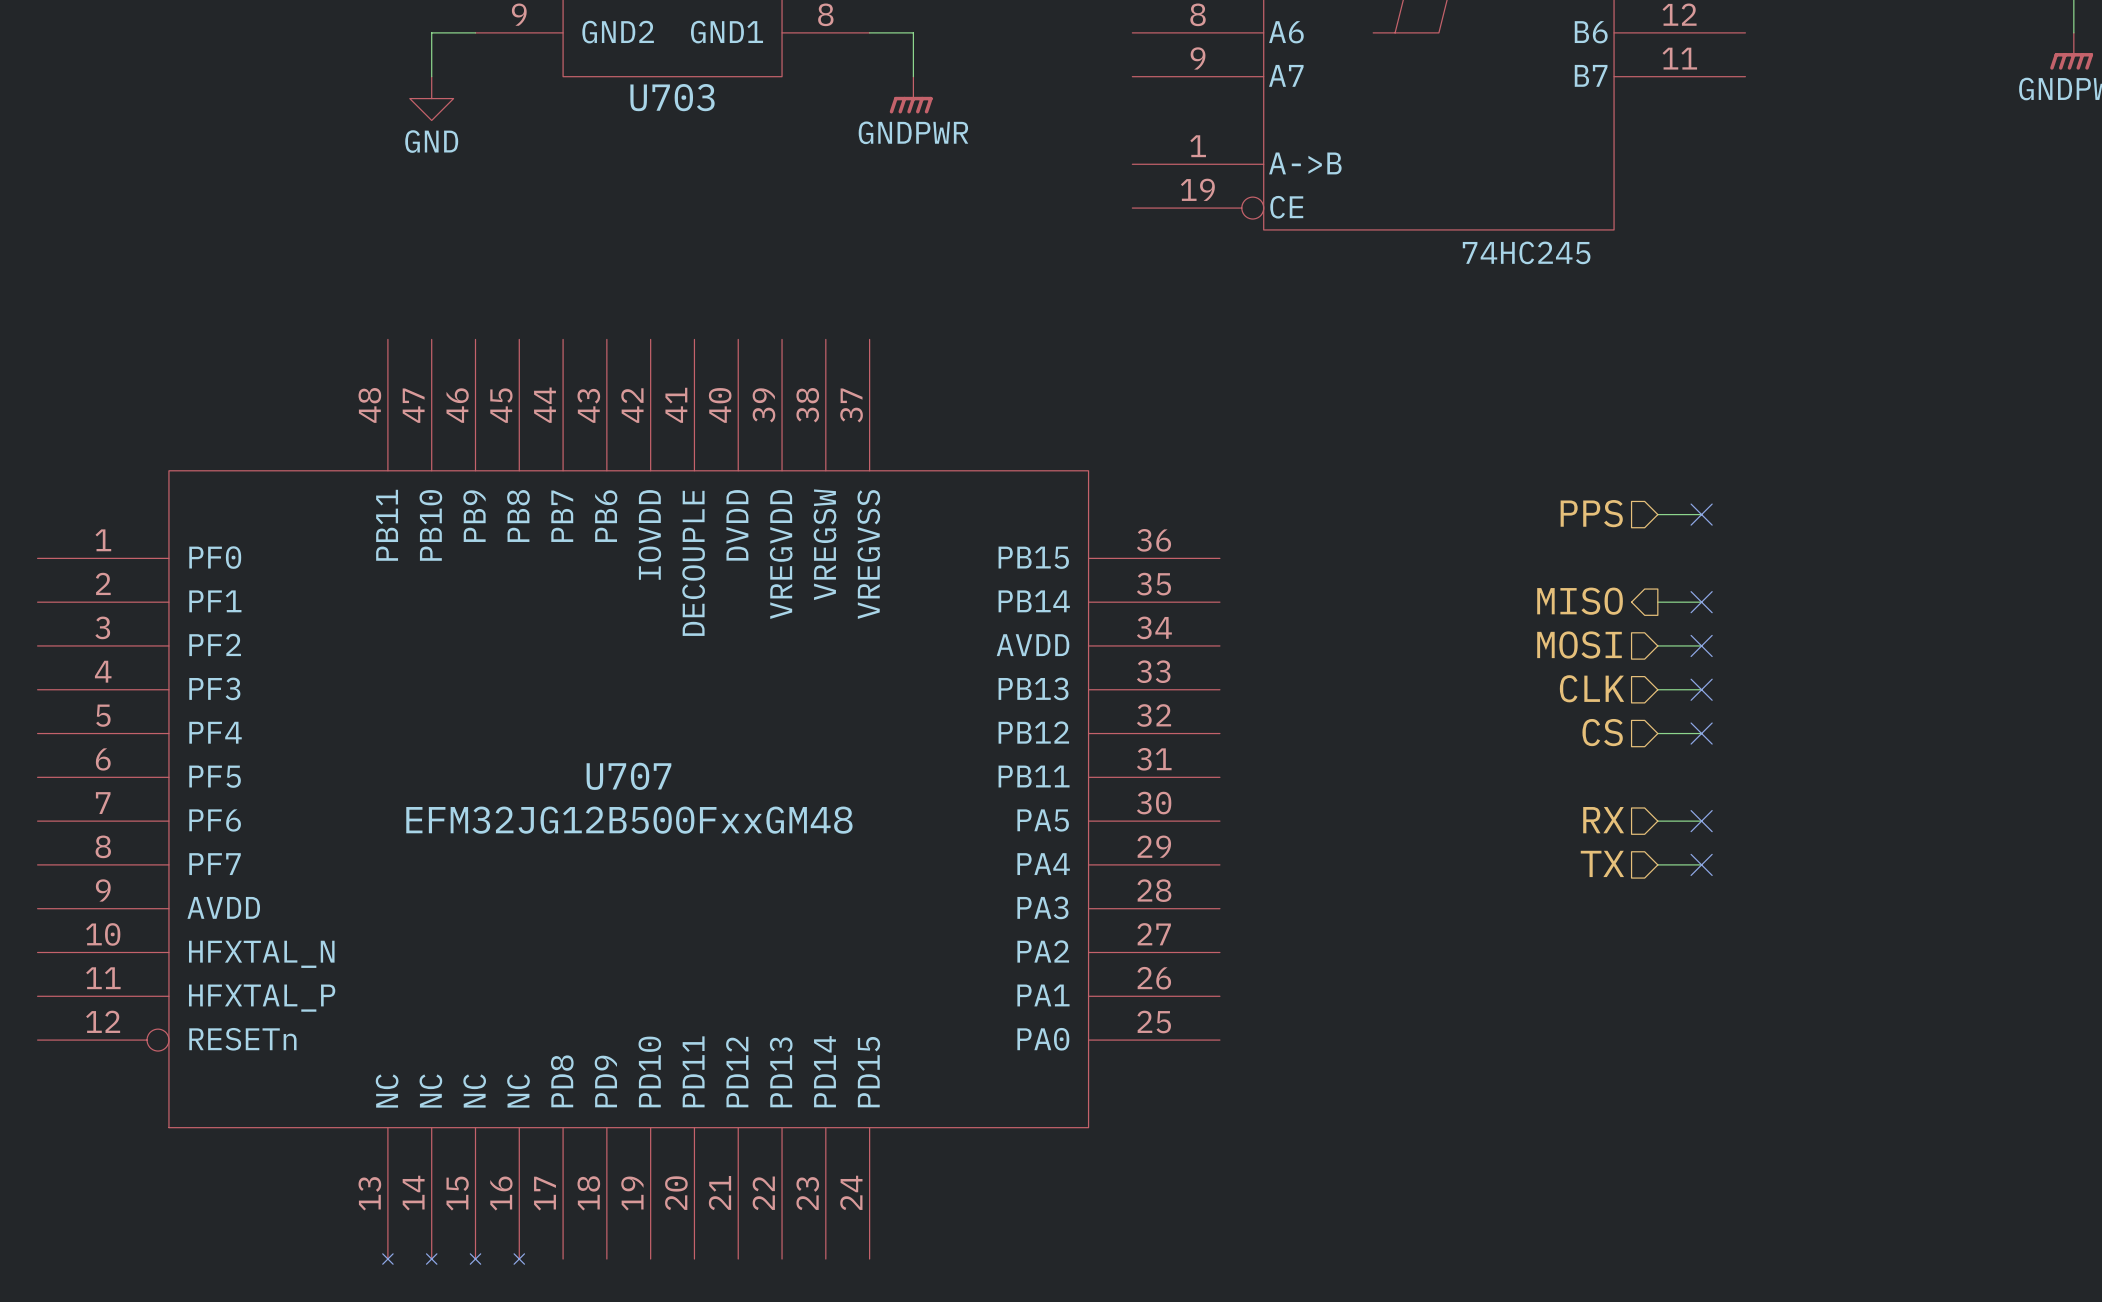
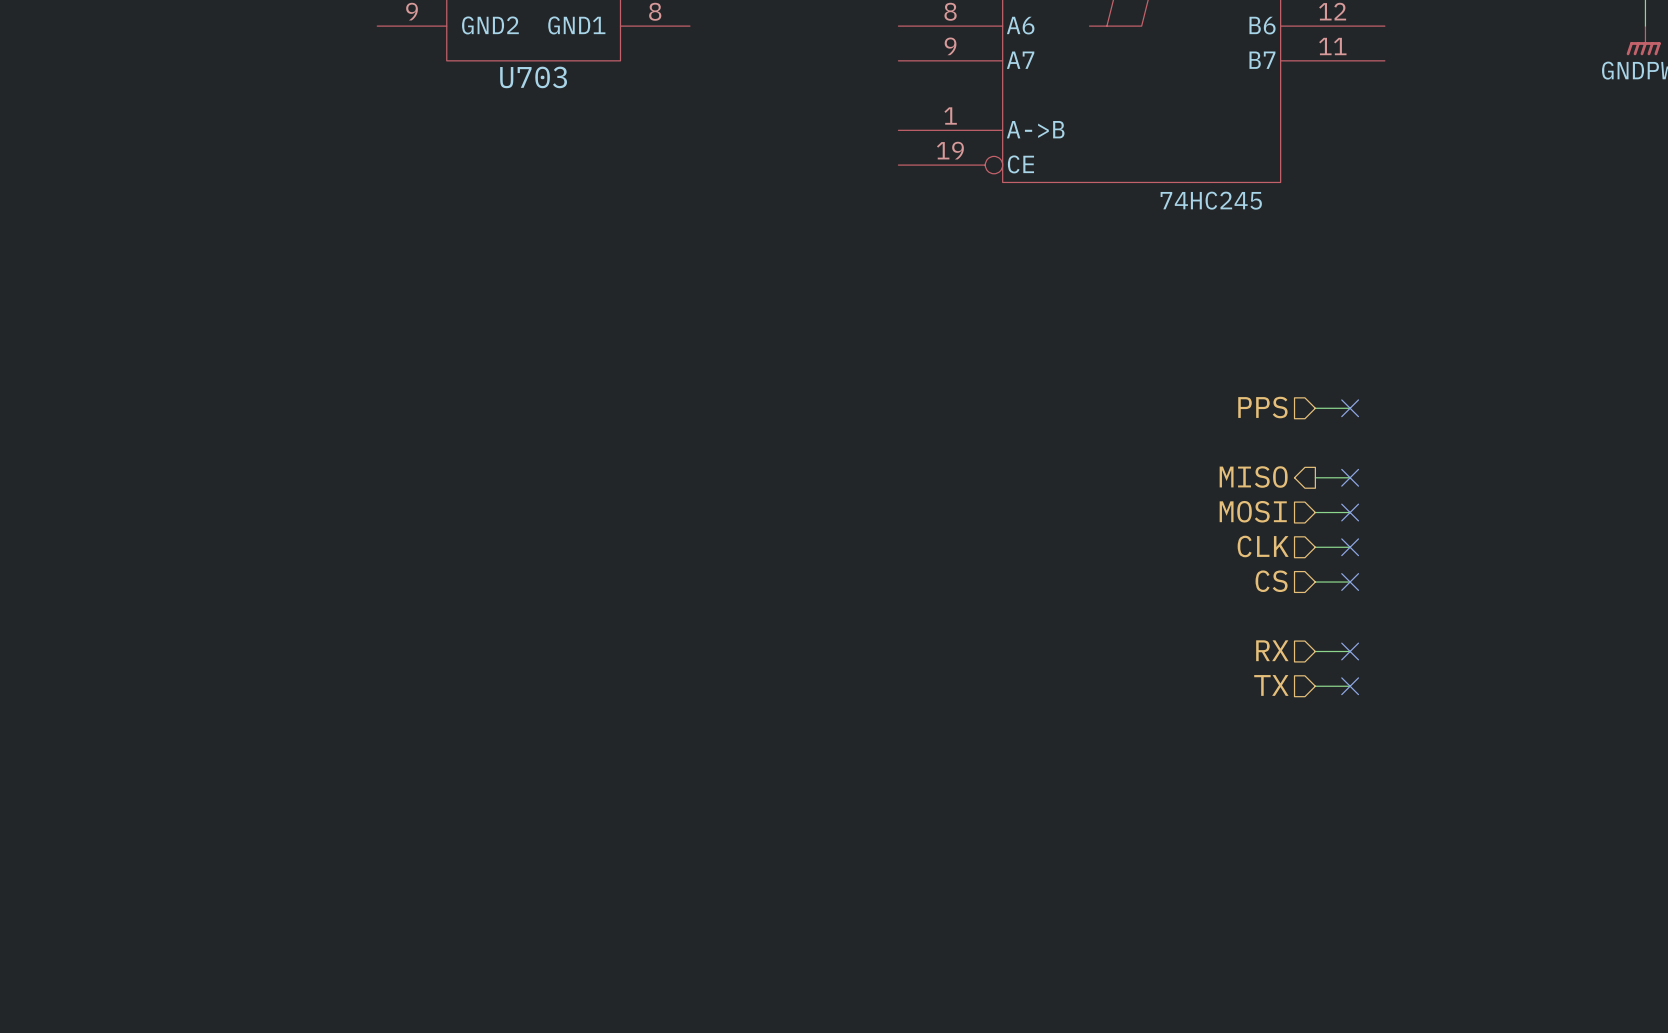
wire: (475, 32) (431, 32) (431, 76) -> none
wire: (869, 32) (913, 32) (913, 76) -> none
power symbol: GNDPWR (911, 95) -> none
power symbol: GND (431, 98) -> none
U707: EFM32JG12B500FxxGM48 (628, 801) -> none

